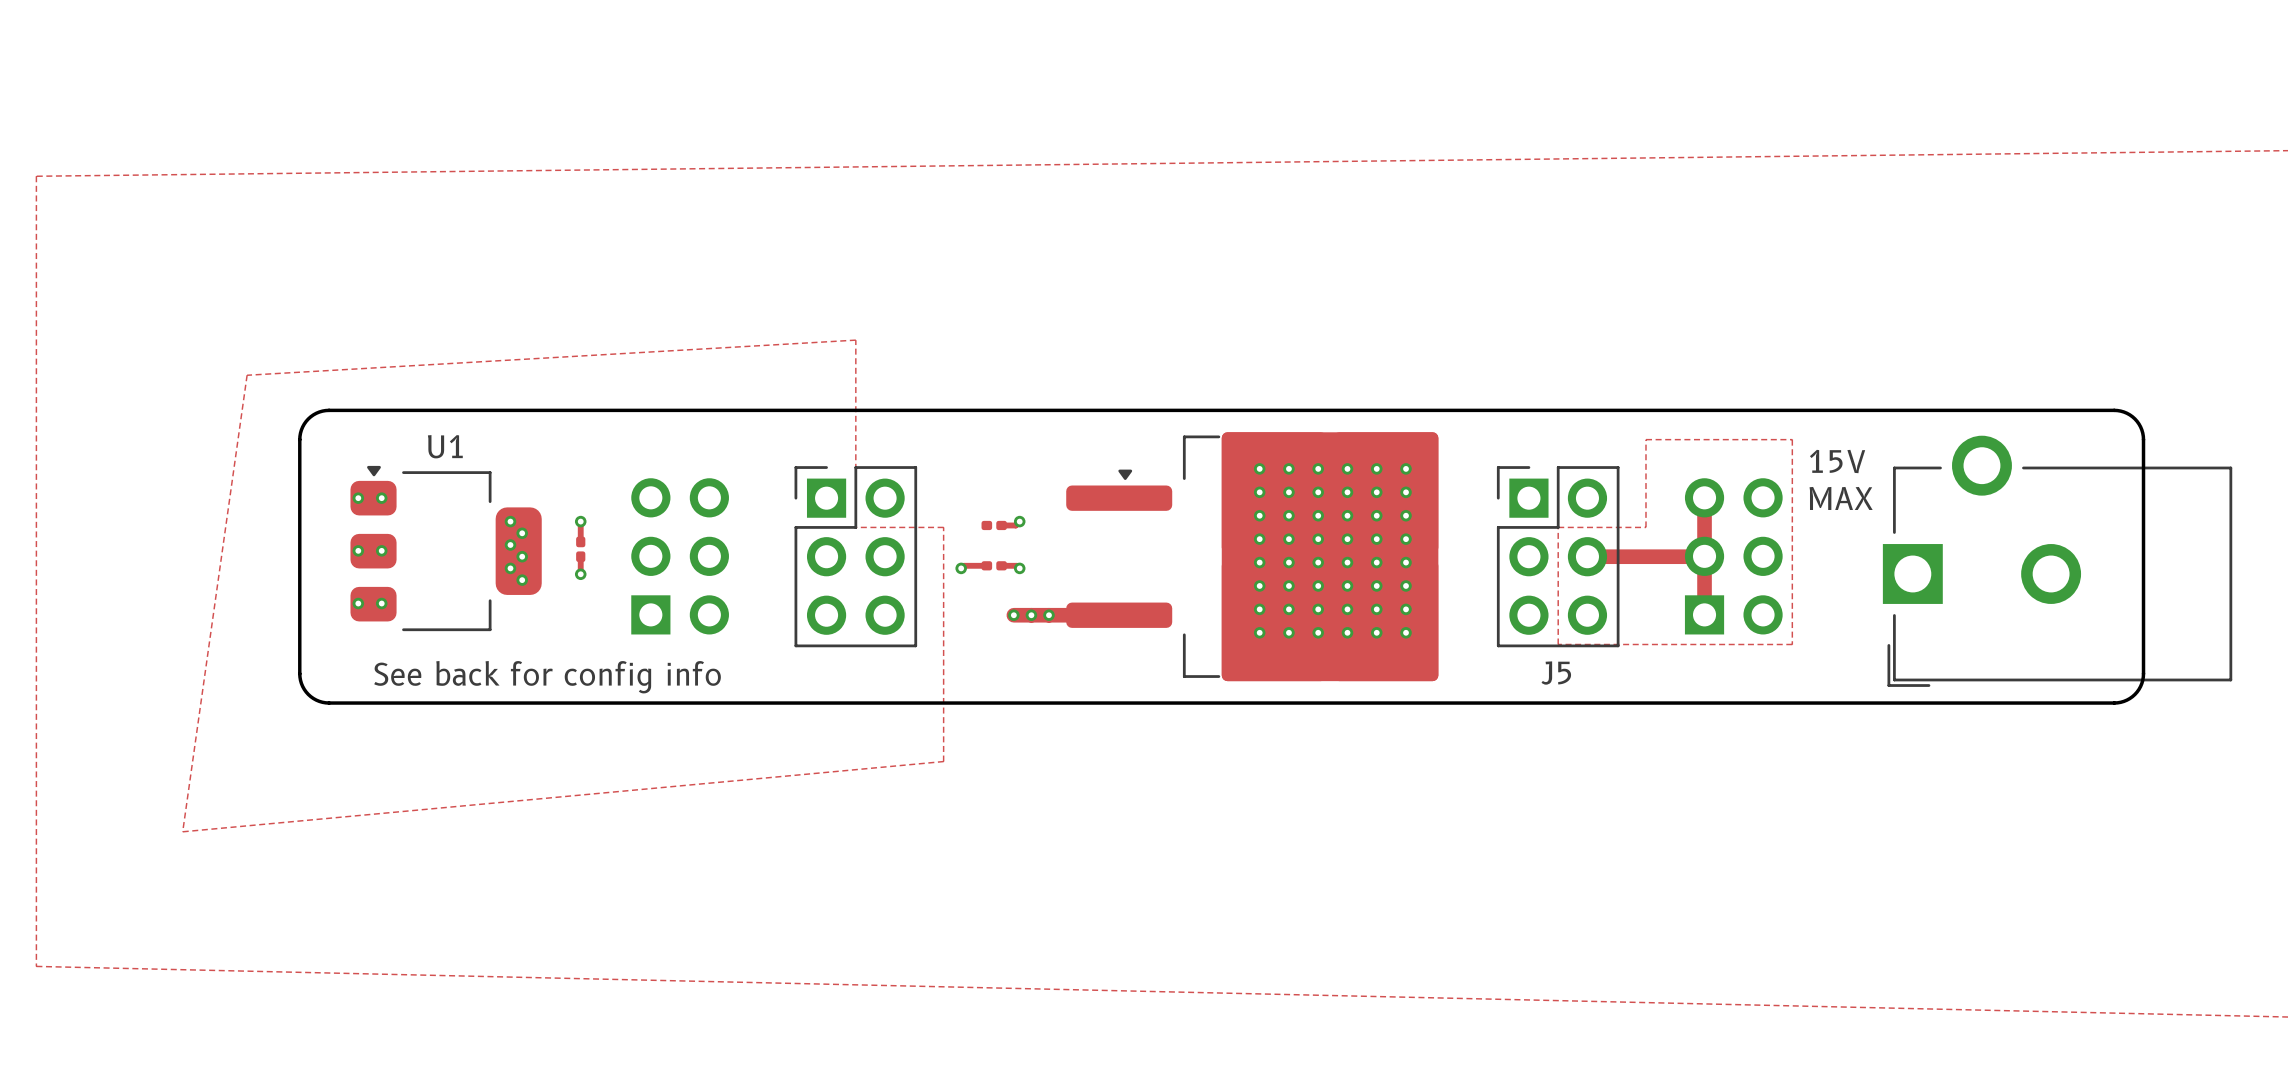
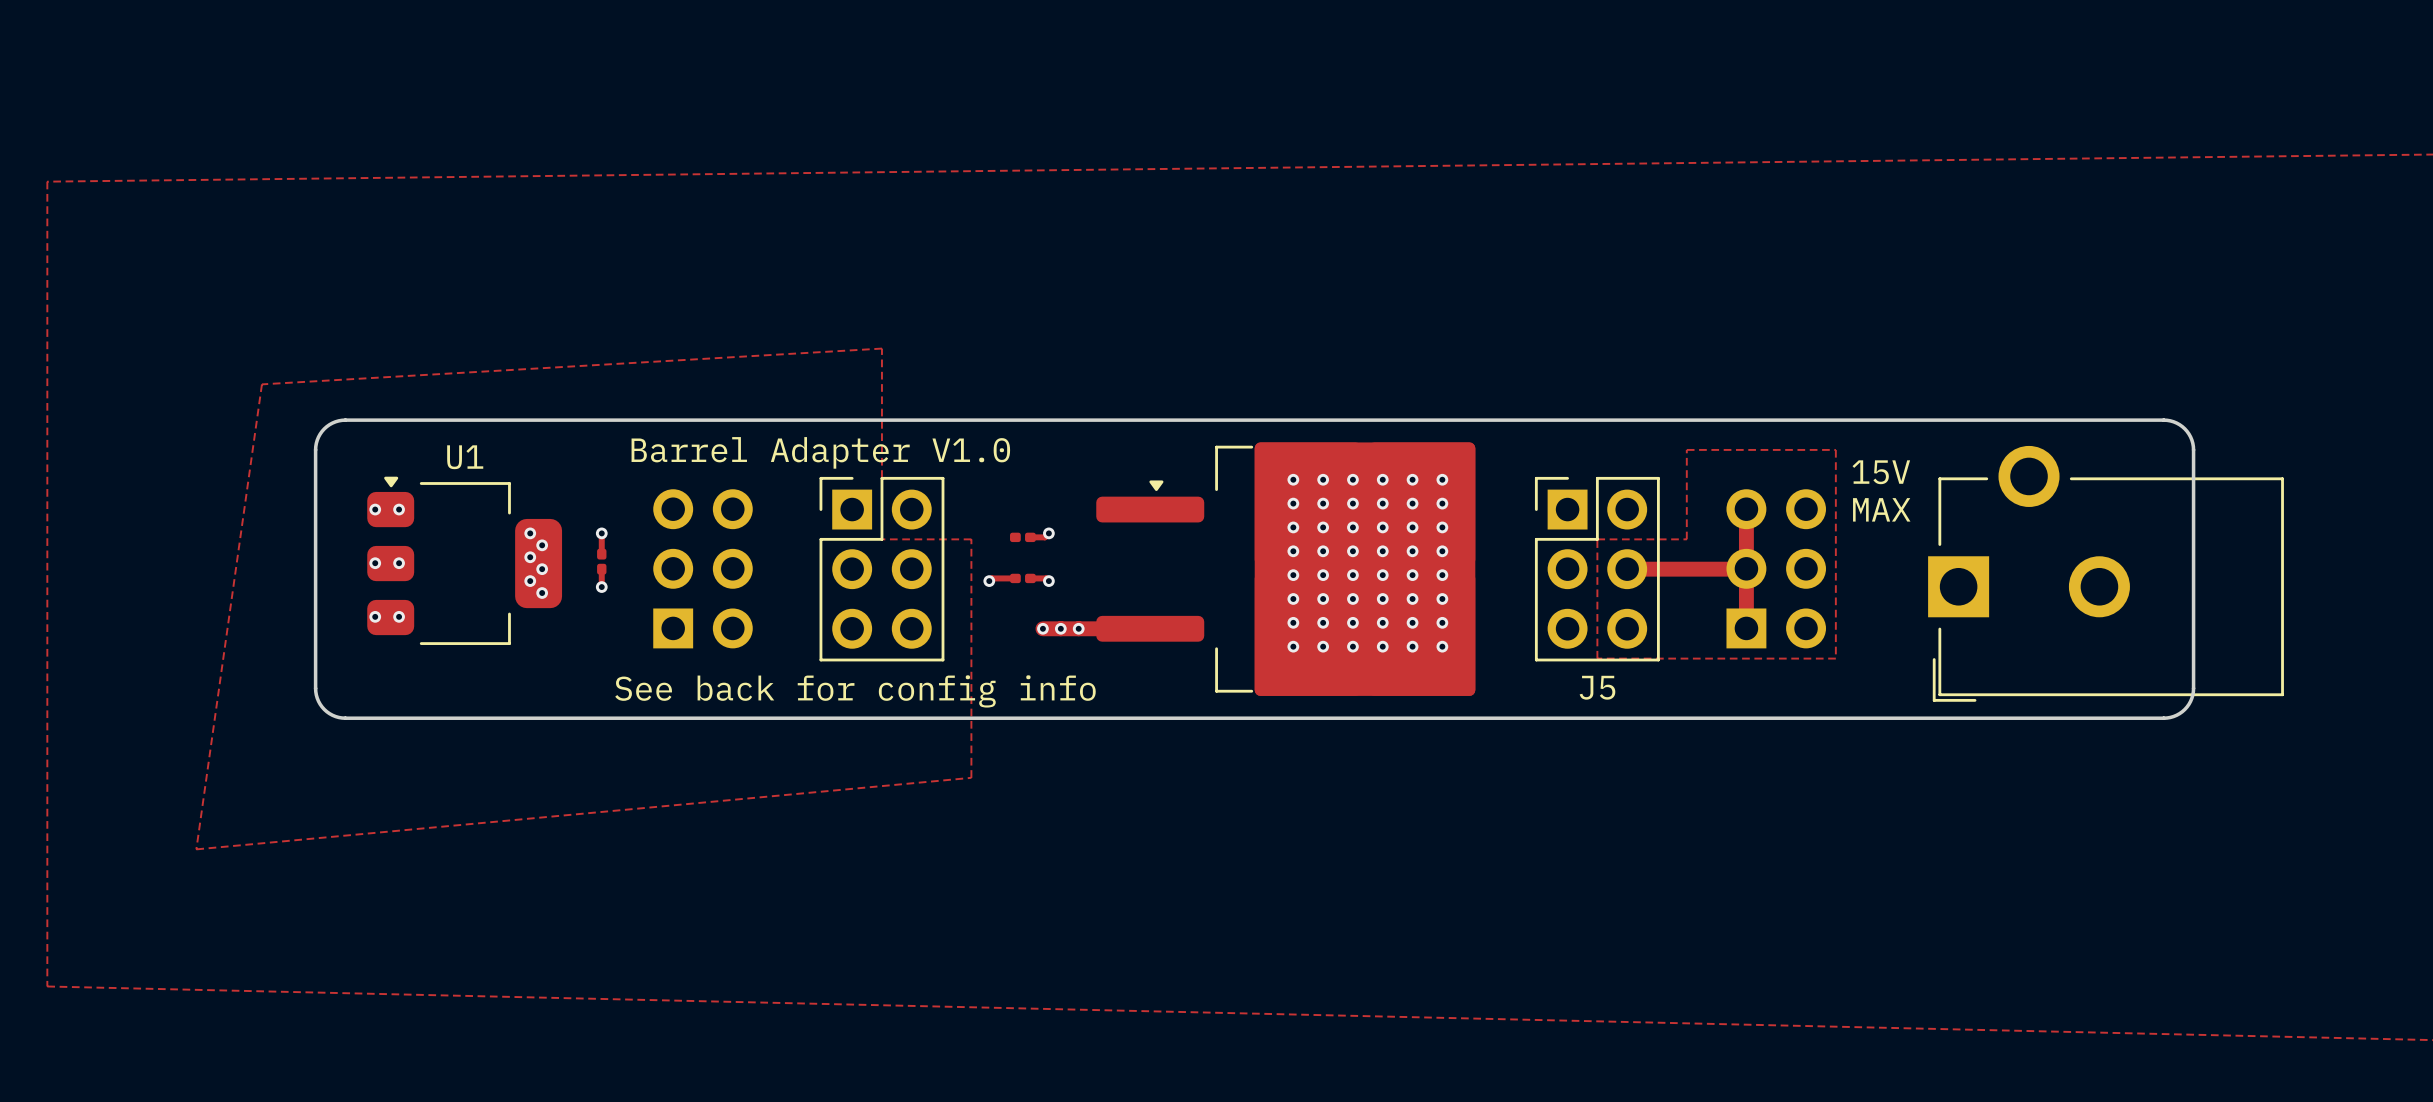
text: none -> Barrel Adapter V1.0 (820, 452)
text position: See back for config info (547, 677) -> See back for config info (855, 691)

